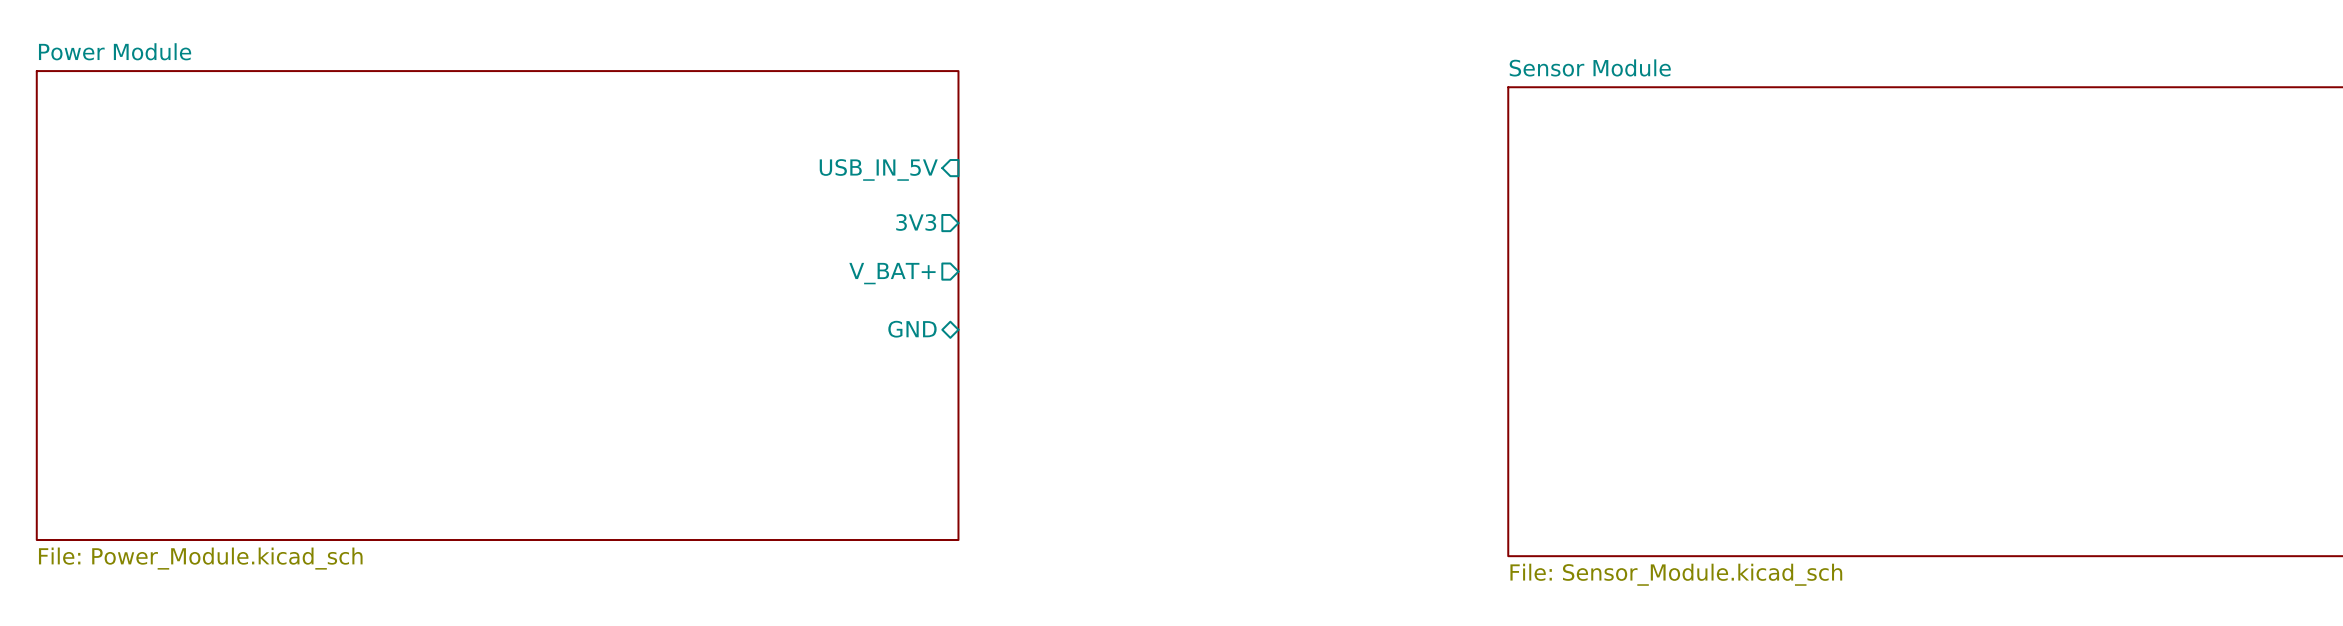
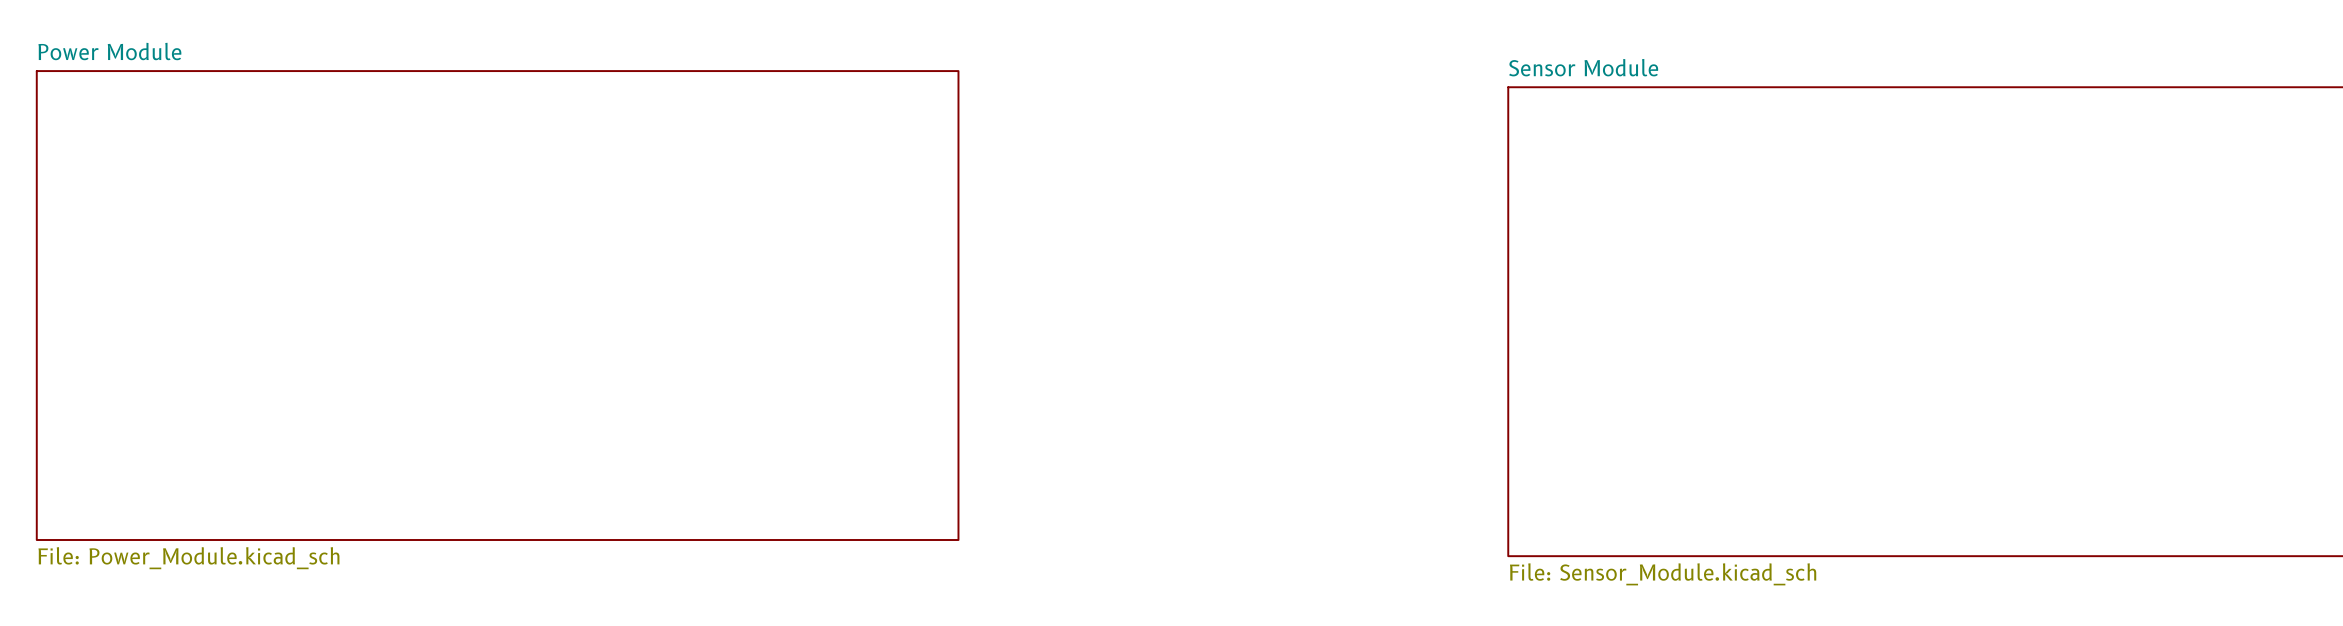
sheet pin: USB_IN_5V (878, 169) -> none
sheet pin: 3V3 (916, 222) -> none
sheet pin: V_BAT+ (892, 273) -> none
sheet pin: GND (912, 329) -> none

